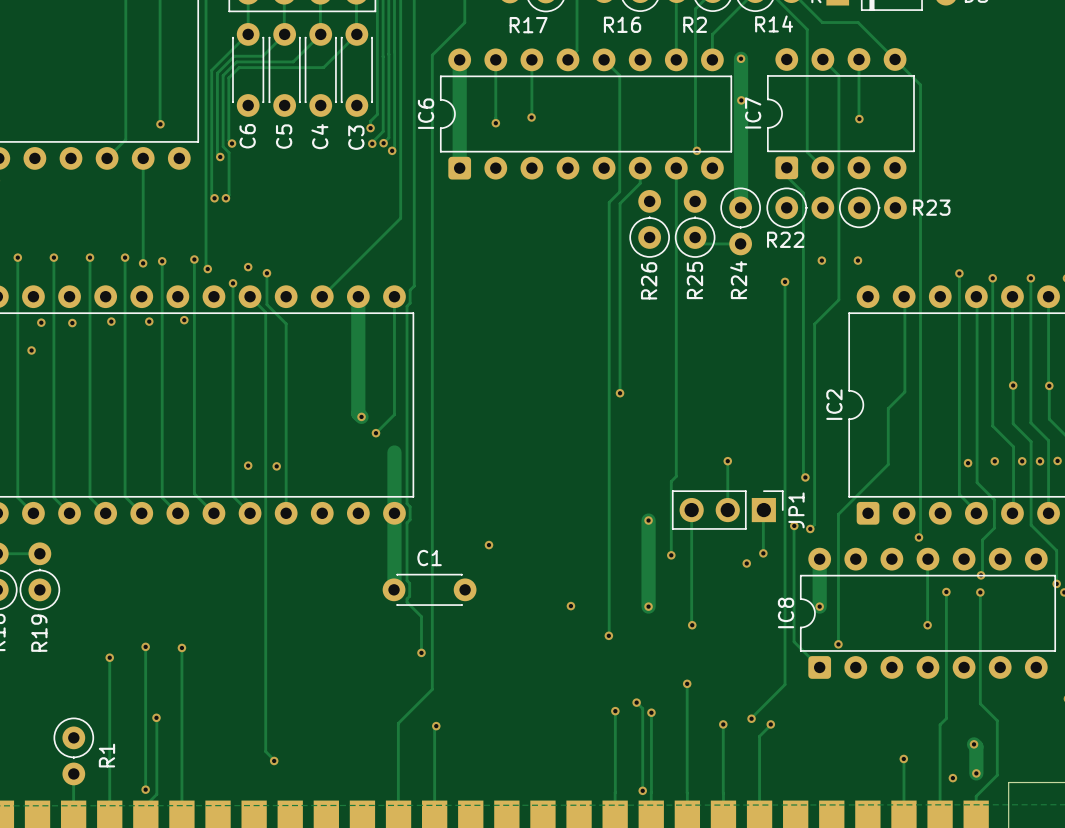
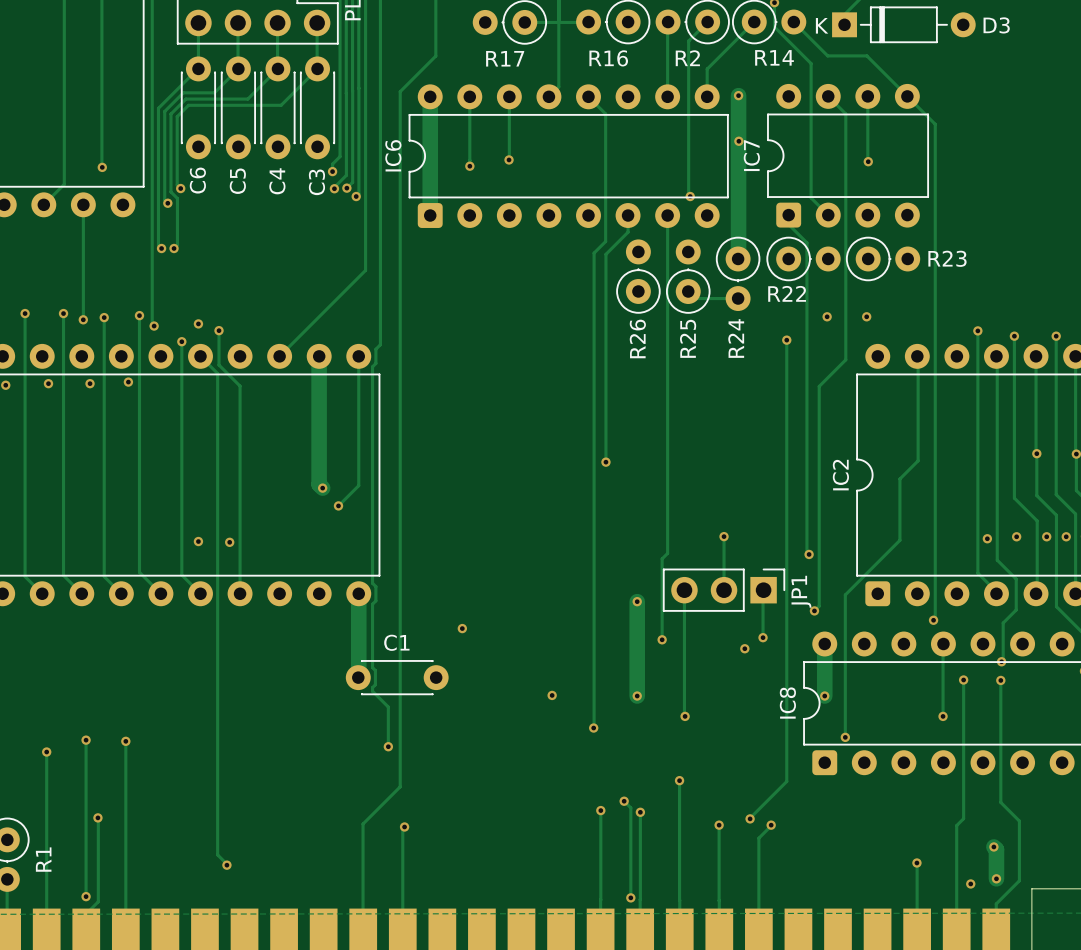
track: (394, 452) (394, 513) -> none
track: (794, 525) (794, 641) (819, 667) -> none
via: (794, 525) -> none

